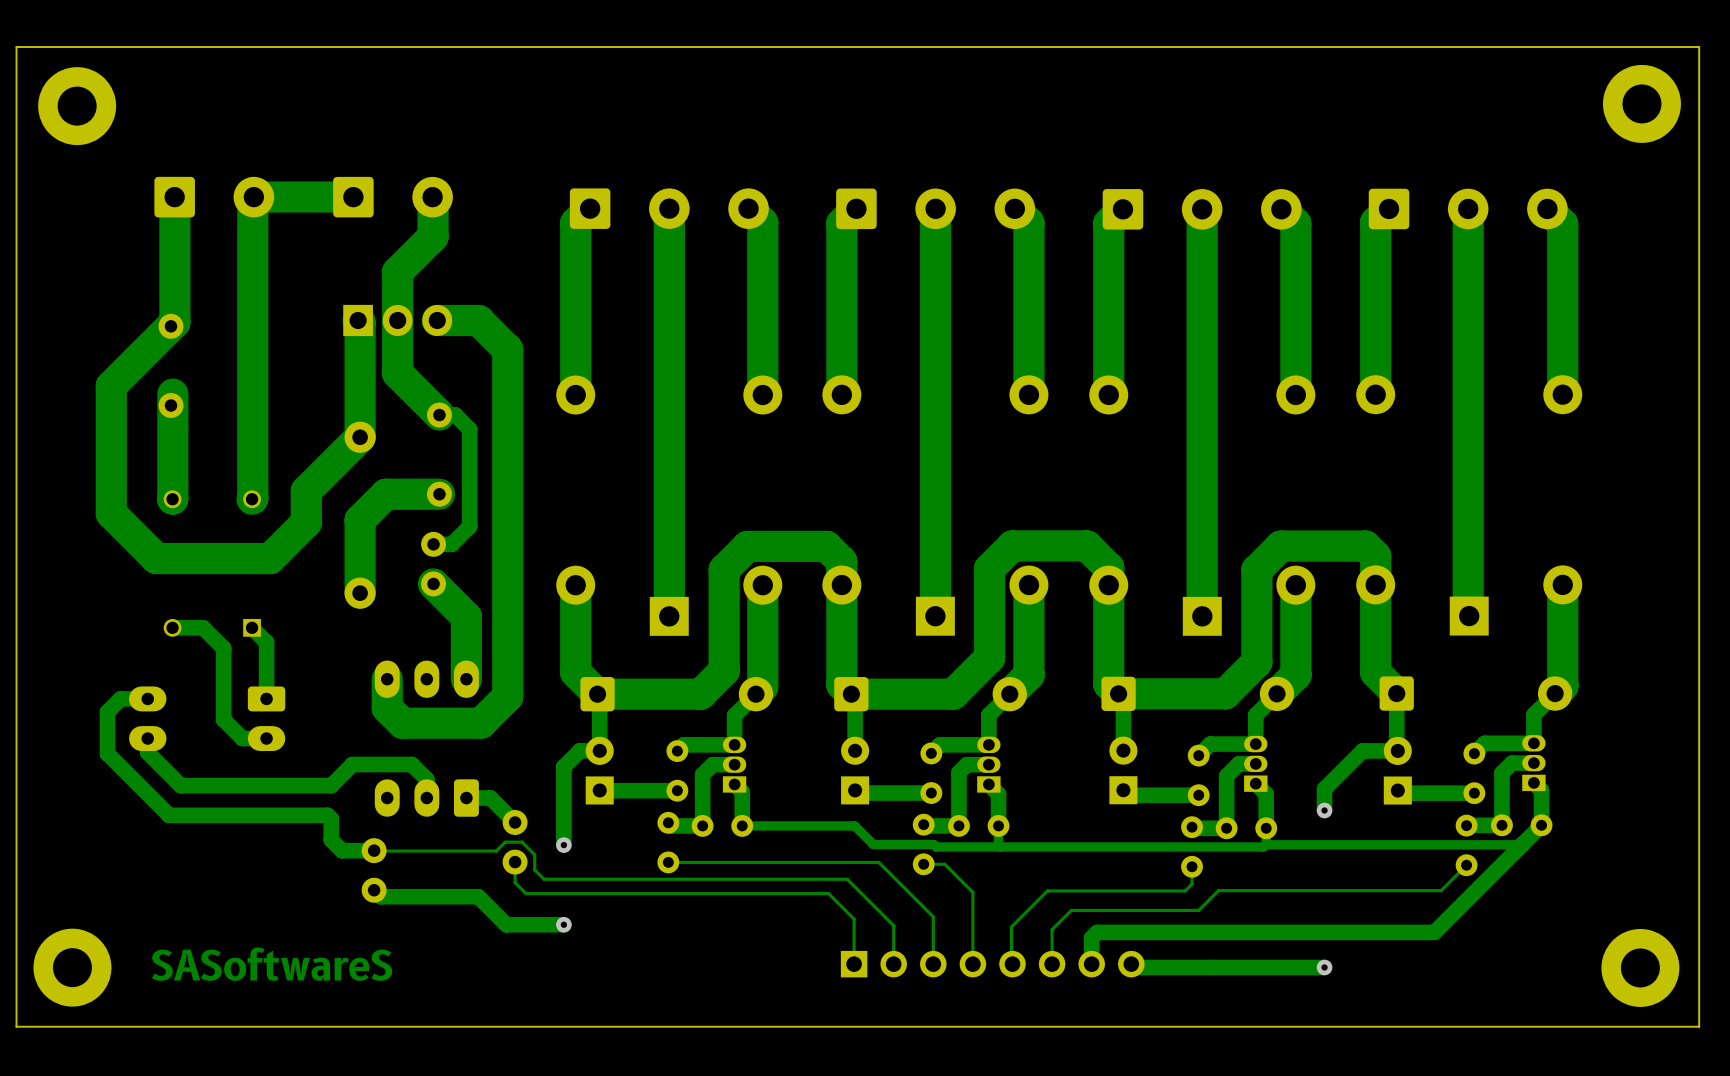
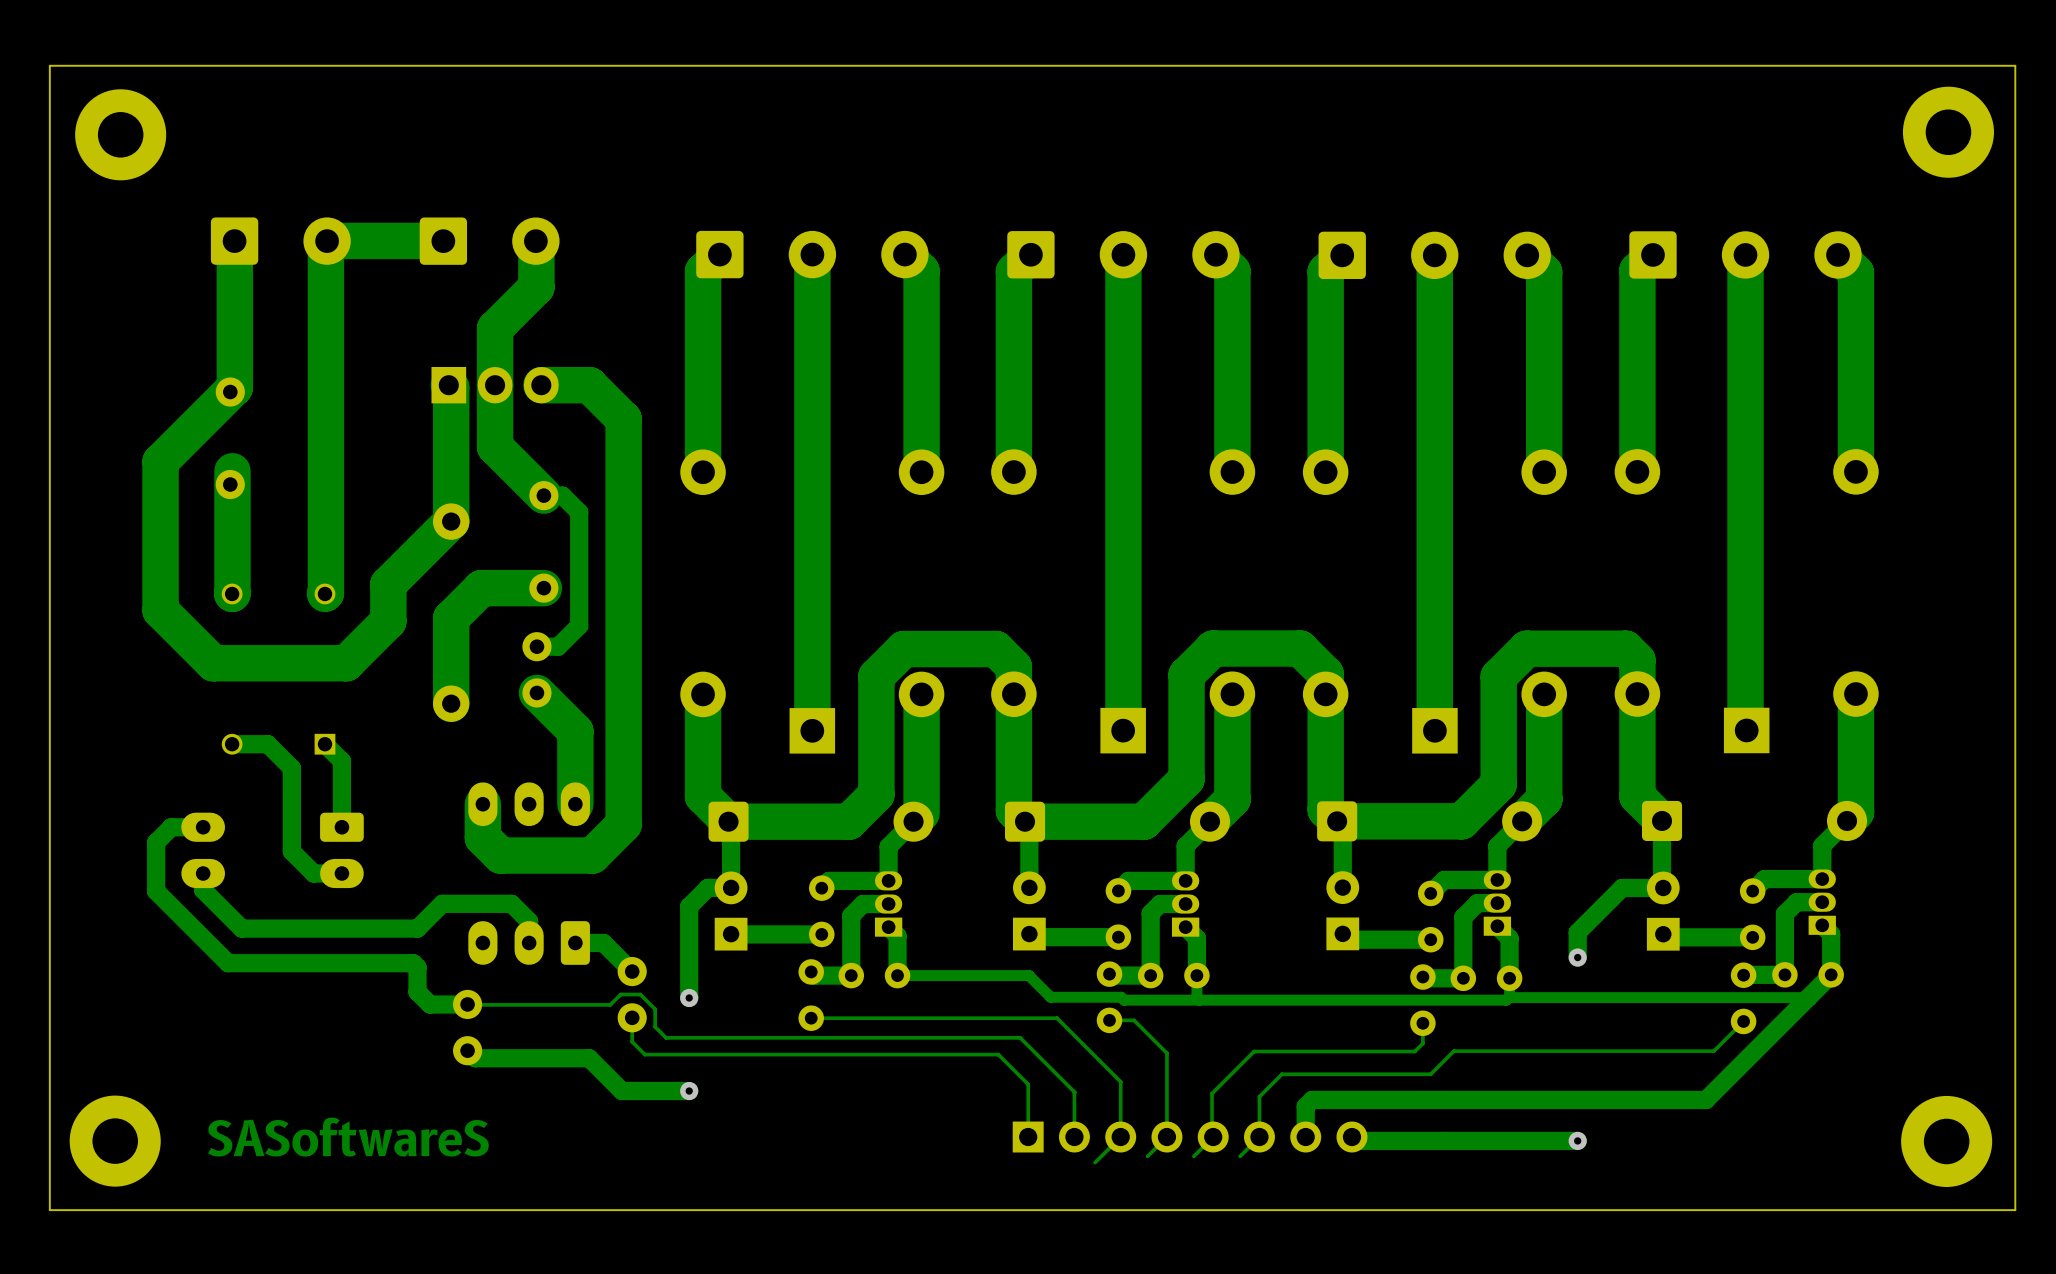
track: none -> (1120, 1137) (1095, 1162)
track: none -> (1166, 1137) (1147, 1156)
track: none -> (1213, 1137) (1193, 1156)
track: none -> (1259, 1137) (1240, 1156)

